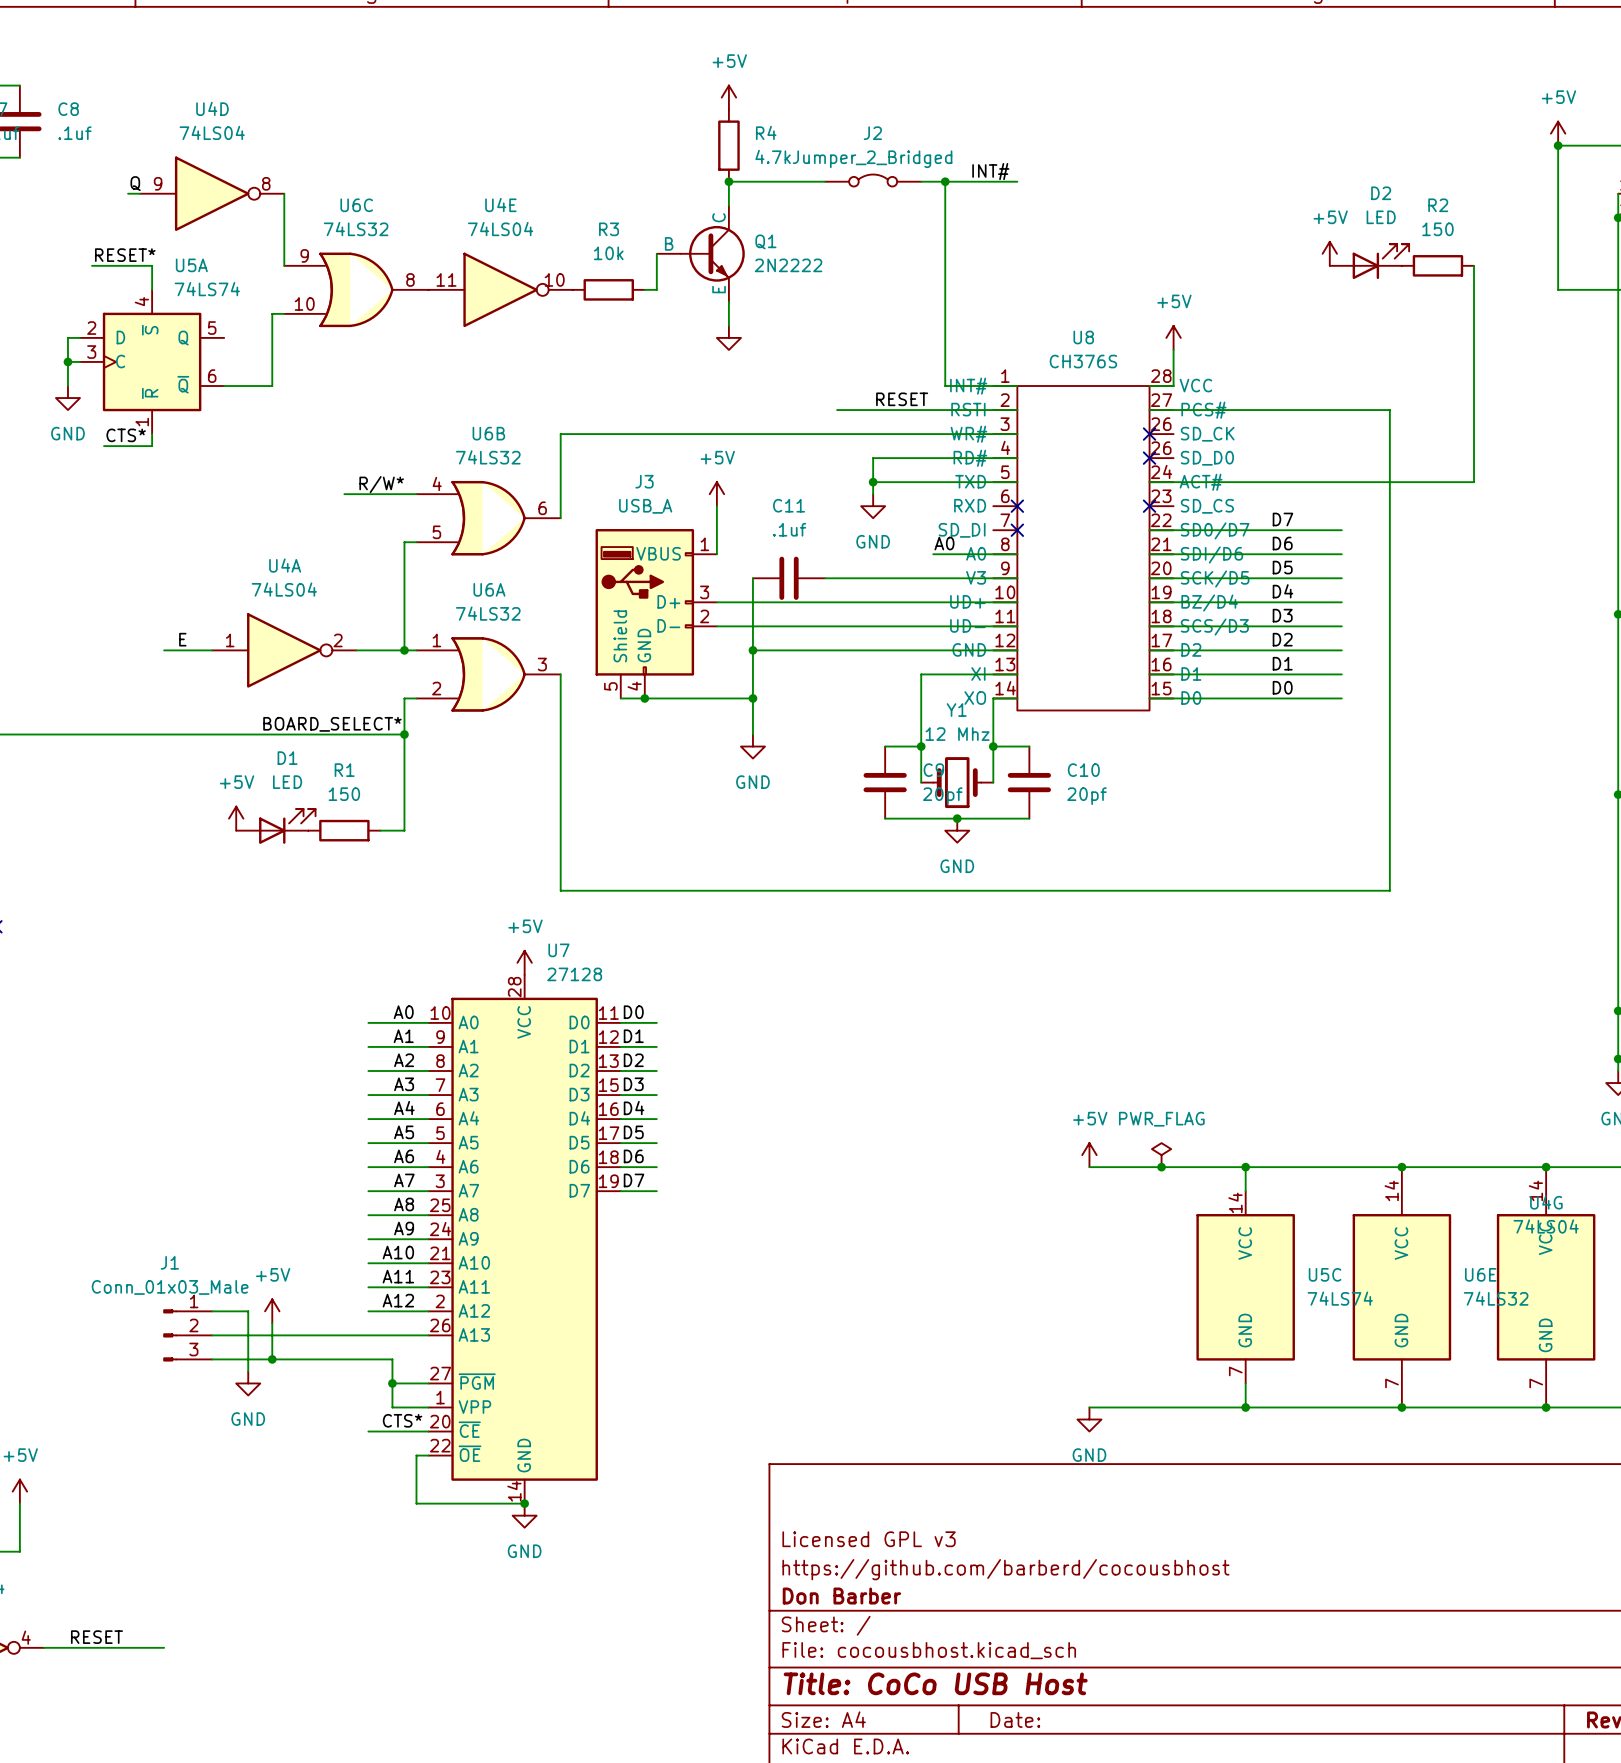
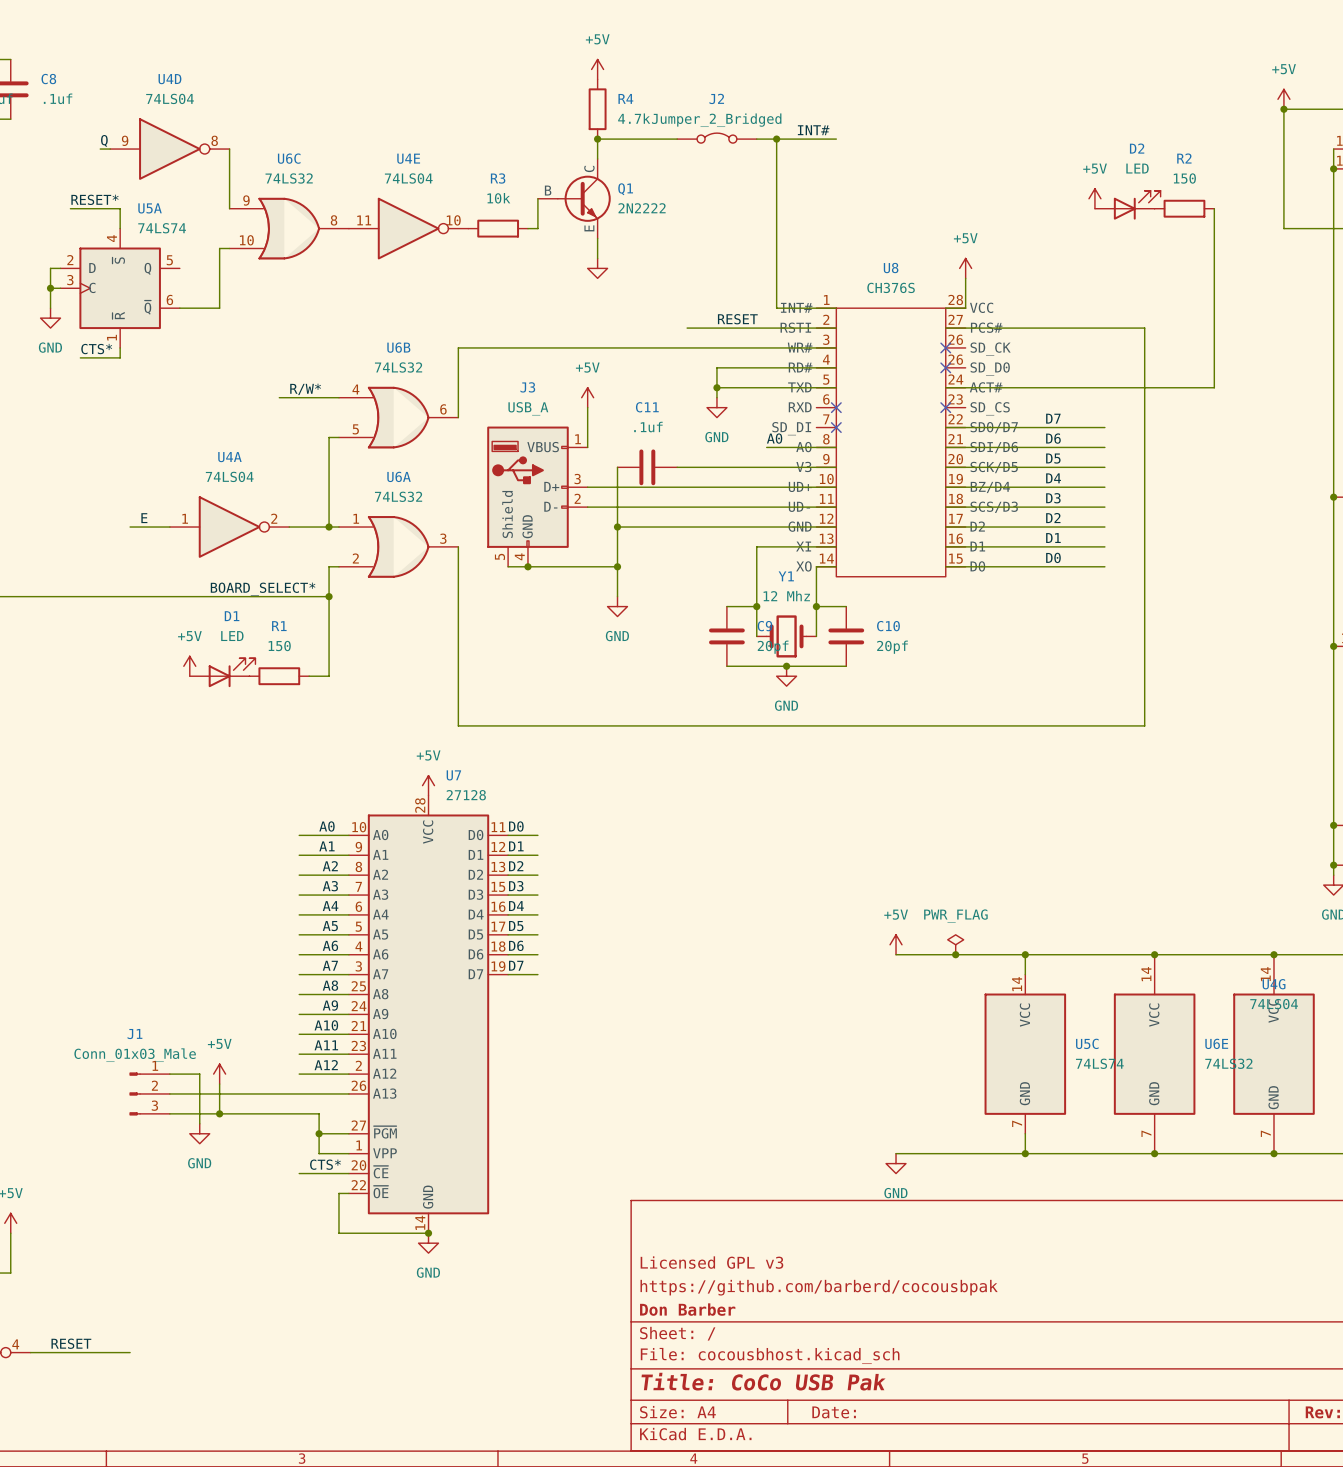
title block: https://github.com/barberd/cocousbhost (1005, 1569) -> https://github.com/barberd/cocousbpak (819, 1287)
title block: Title: CoCo USB Host (935, 1683) -> Title: CoCo USB Pak (763, 1381)

